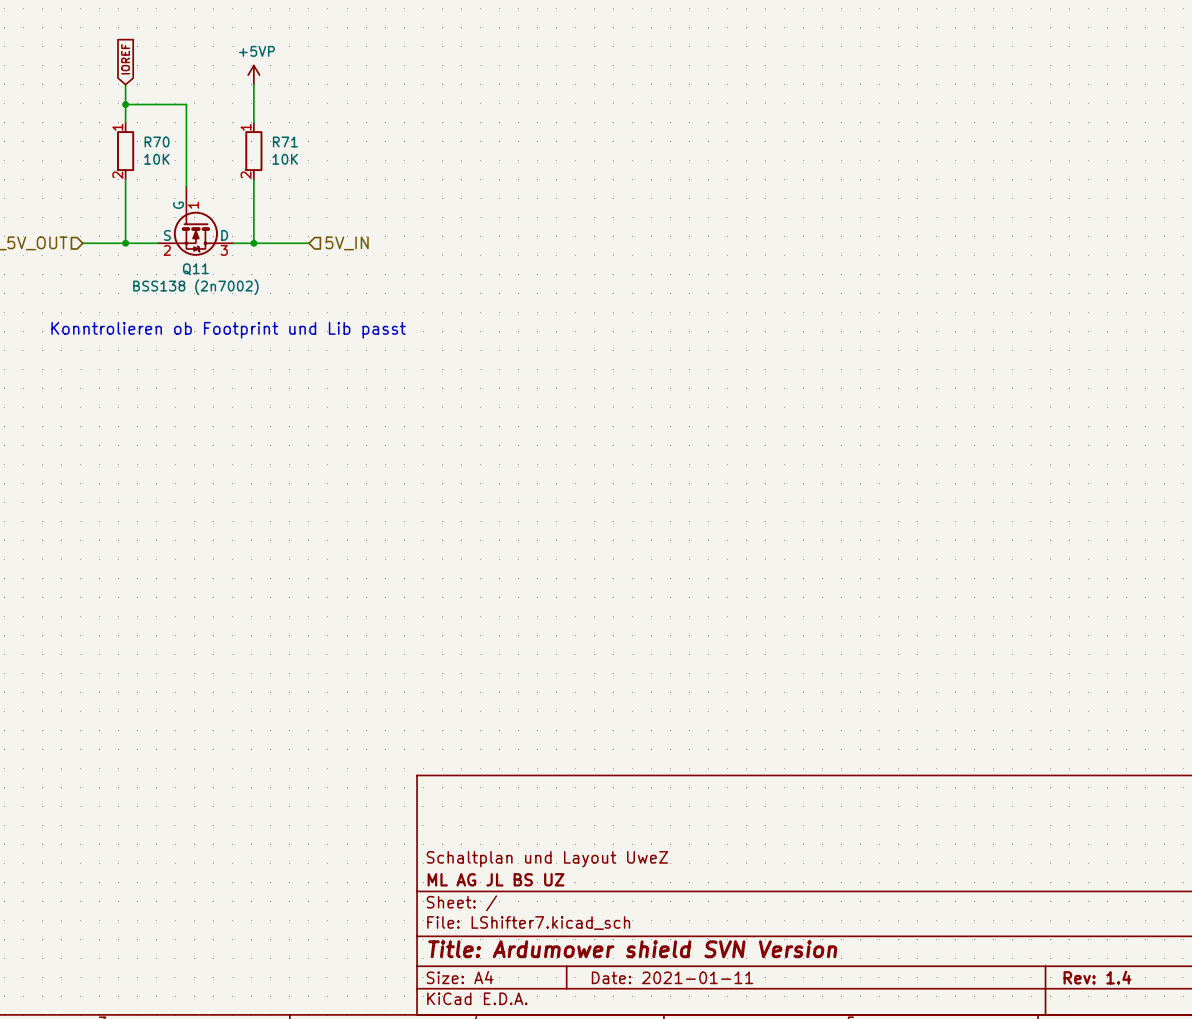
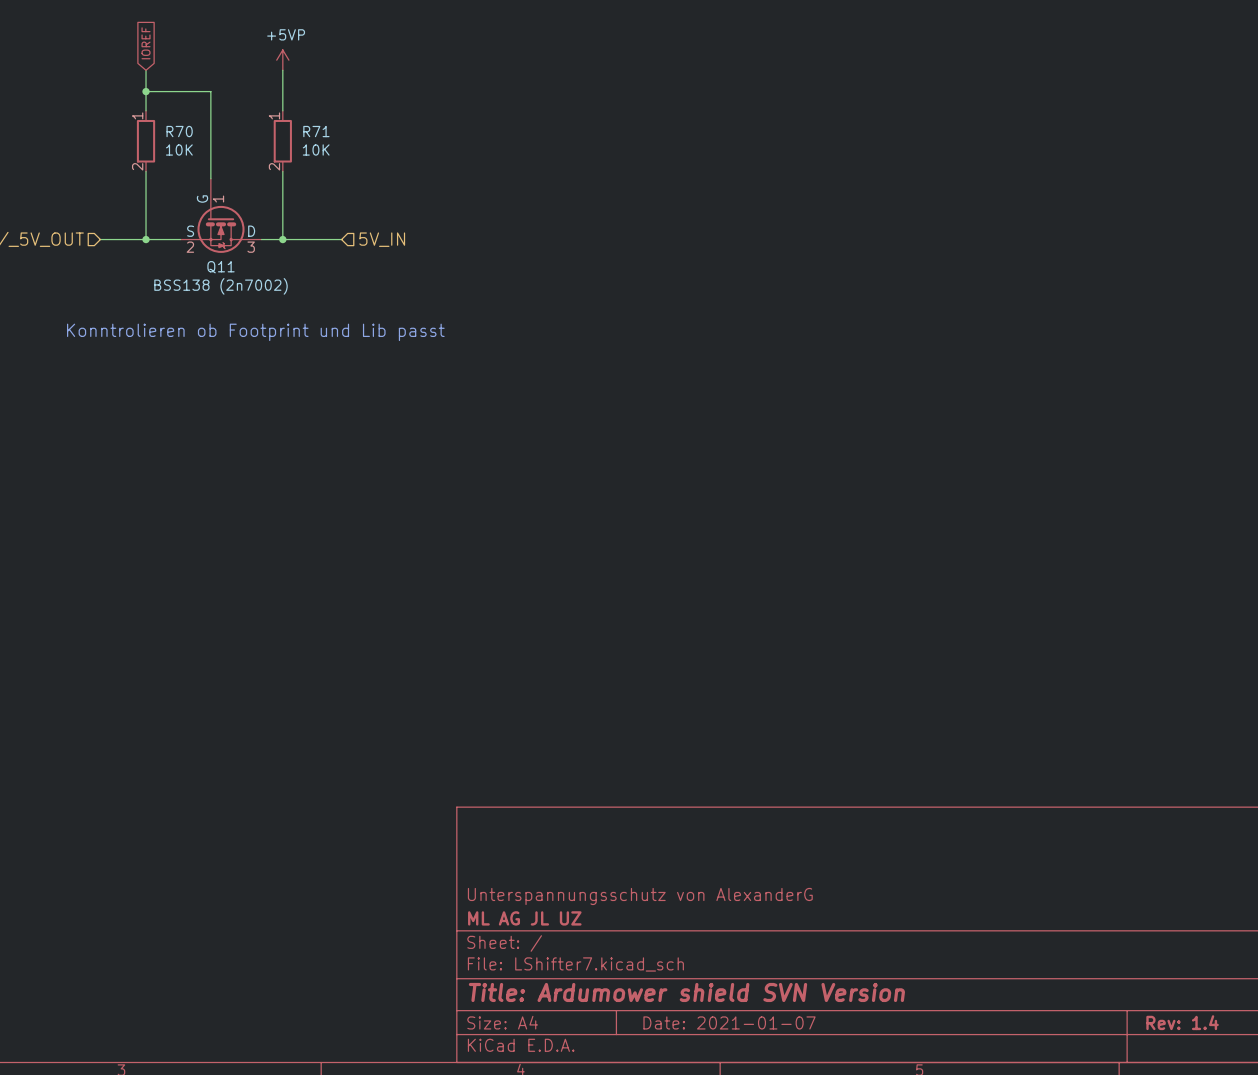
title block: Schaltplan und Layout UweZ (547, 859) -> Unterspannungsschutz von AlexanderG (640, 896)
title block: ML AG JL BS UZ (496, 879) -> ML AG JL UZ (524, 918)
title block: Date: 2021-01-11 (672, 977) -> Date: 2021-01-07 (729, 1022)

